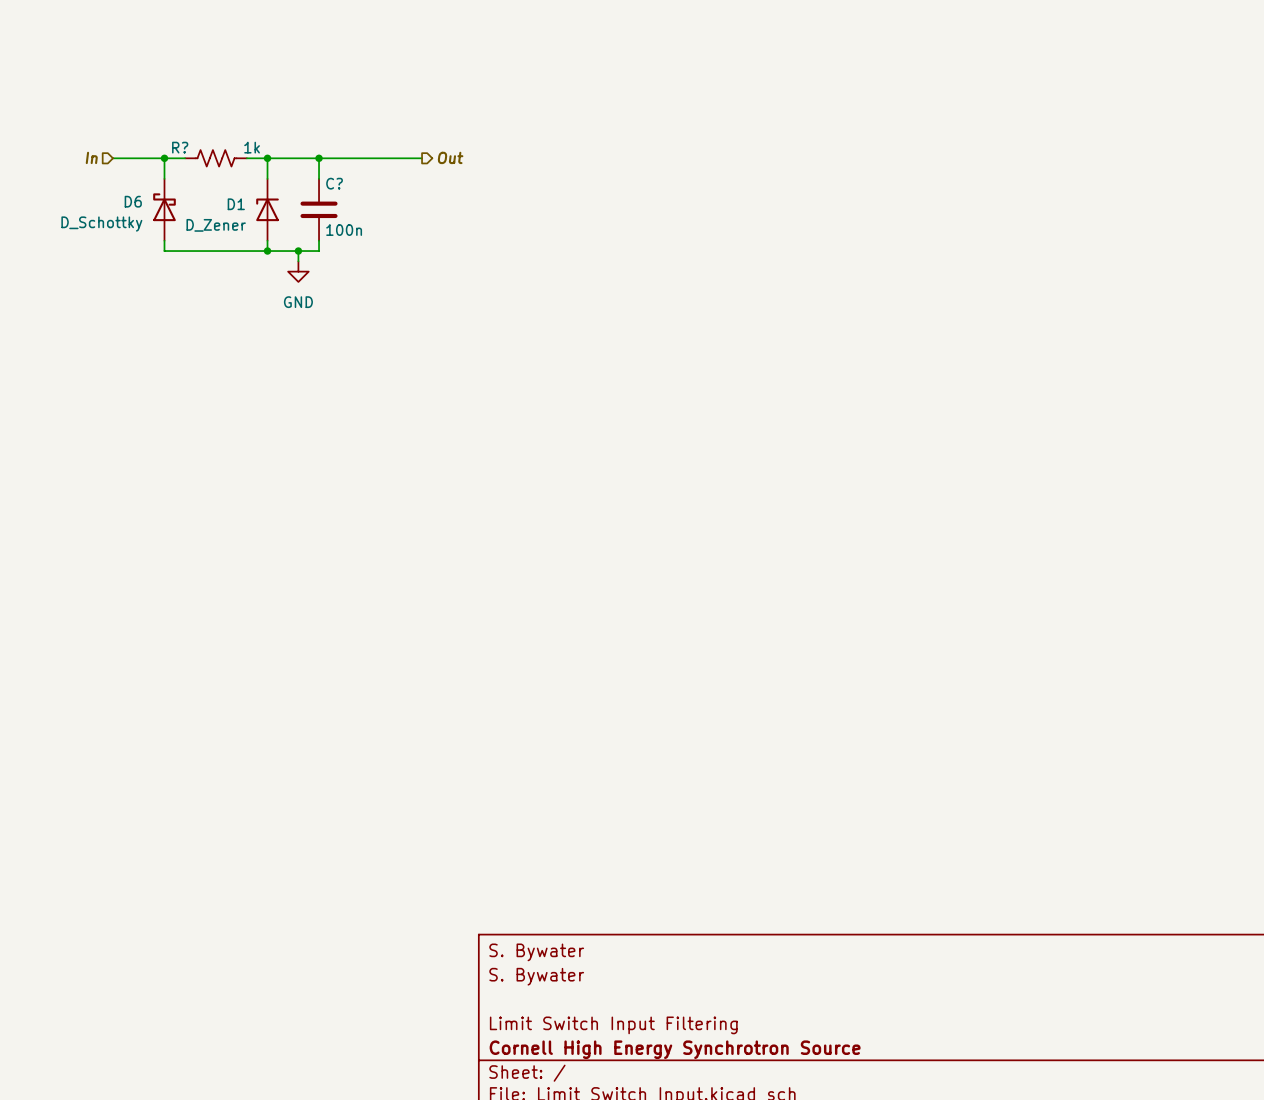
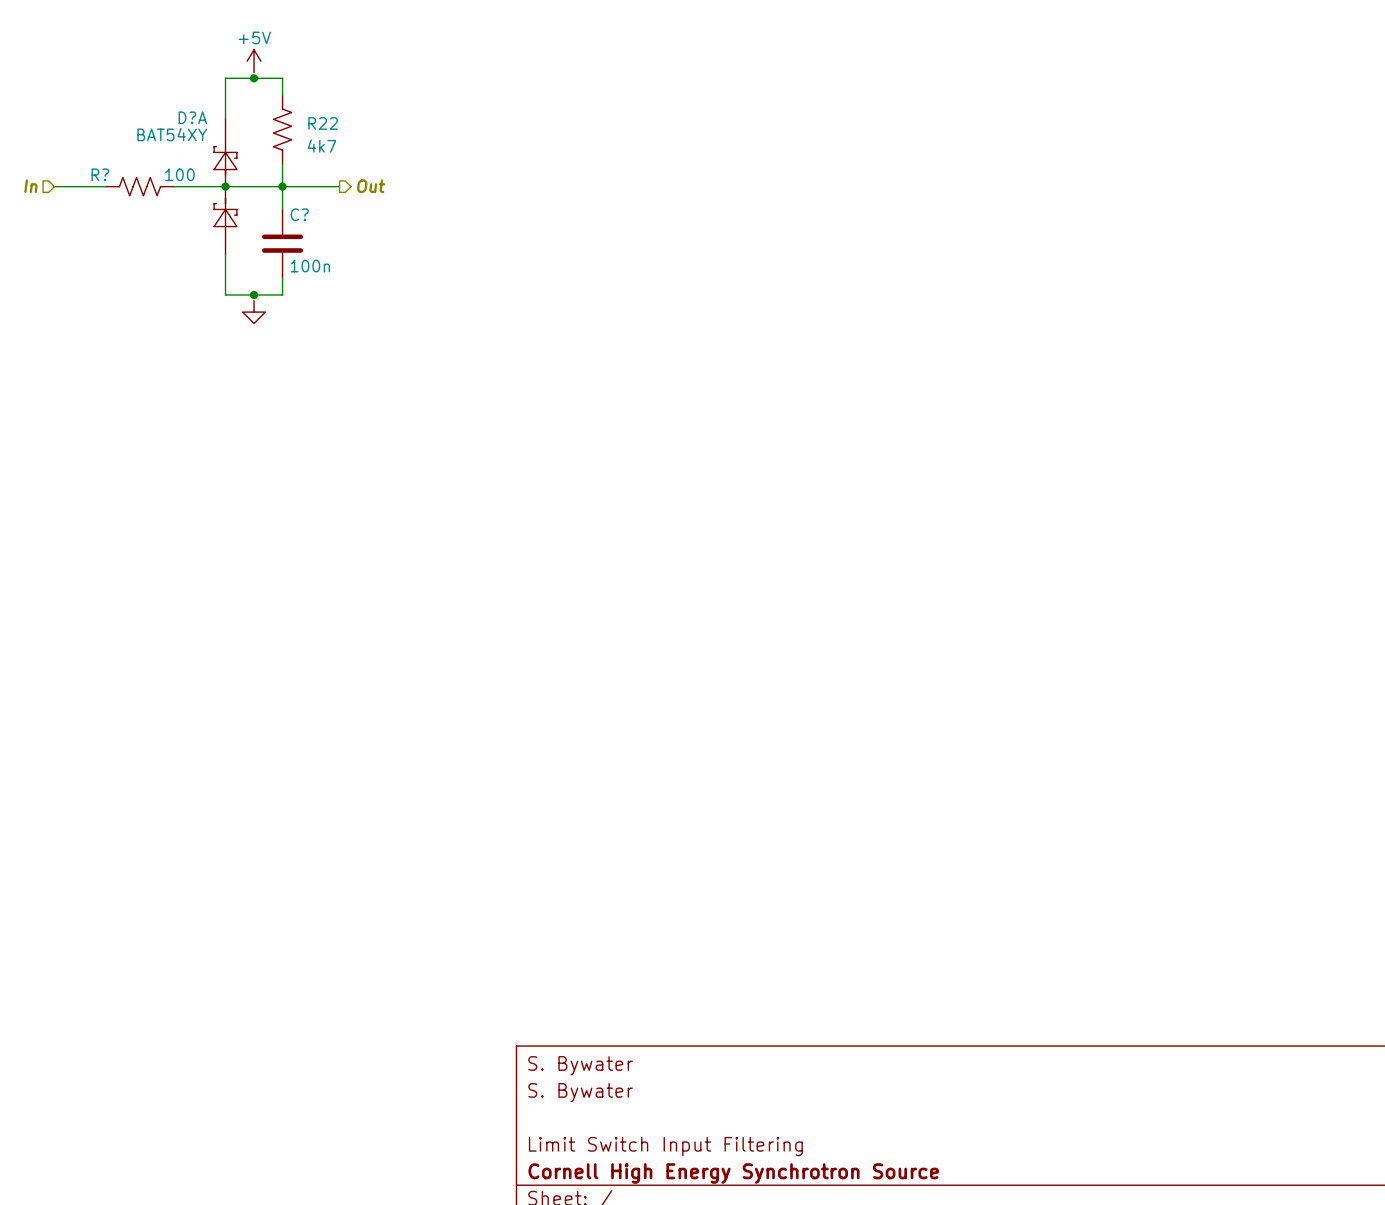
power symbol: none -> +5V (254, 61)
junction: none -> (254, 78)
wire: none -> (282, 95) (282, 78) (225, 78) (225, 118)
R22: none -> 4k7 (282, 129)
hierarchical label position: In (91, 157) -> In (30, 186)
hierarchical label position: Out (450, 157) -> Out (371, 186)
wire: none -> (54, 186) (105, 186)
R?: none -> 100 (139, 186)
wire: (164, 158) (164, 178) -> (282, 163) (282, 186)
junction: (164, 158) -> none
junction: none -> (225, 186)
R?: 1k (216, 158) -> none
D?A: none -> BAT54XY (225, 186)
junction: (319, 158) -> none
wire: (422, 158) (319, 158) (319, 178) -> none
D6: D_Schottky (164, 209) -> none
D1: D_Zener (267, 209) -> none
C? position: (319, 209) -> (282, 243)
wire: none -> (225, 255) (225, 294) (282, 294) (282, 289)
wire: (164, 240) (164, 251) (319, 251) (319, 240) -> none
junction position: (267, 251) -> (254, 294)
wire: (298, 251) (298, 261) -> none
junction: (298, 251) -> none
power symbol: none -> (254, 312)
power symbol: GND (298, 271) -> none

